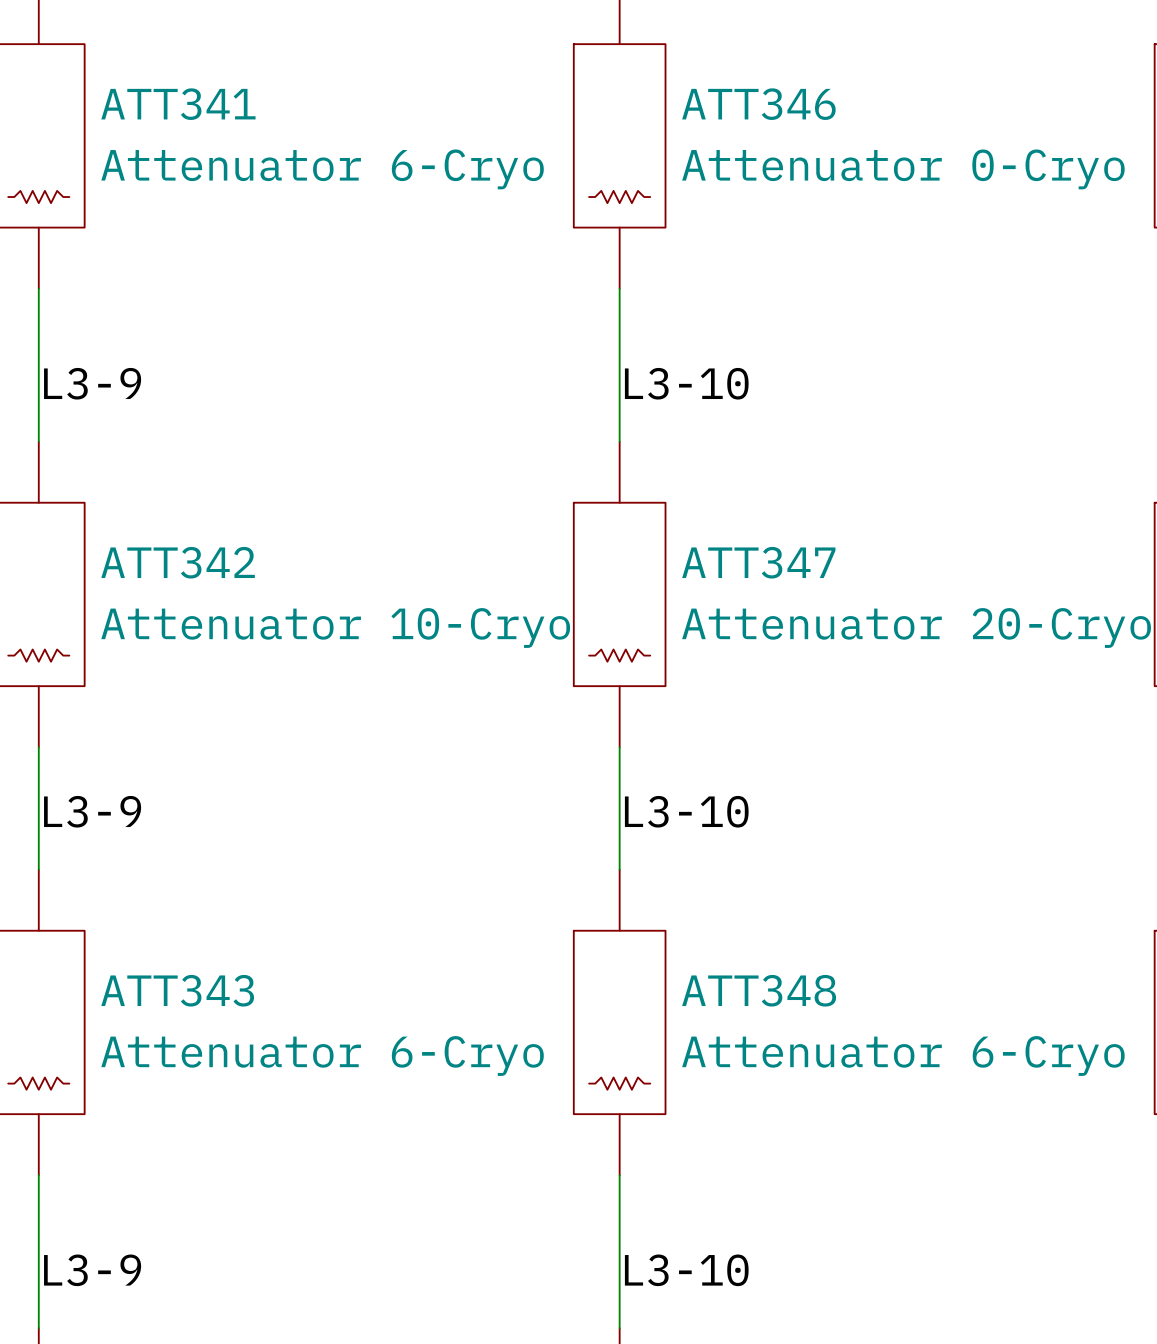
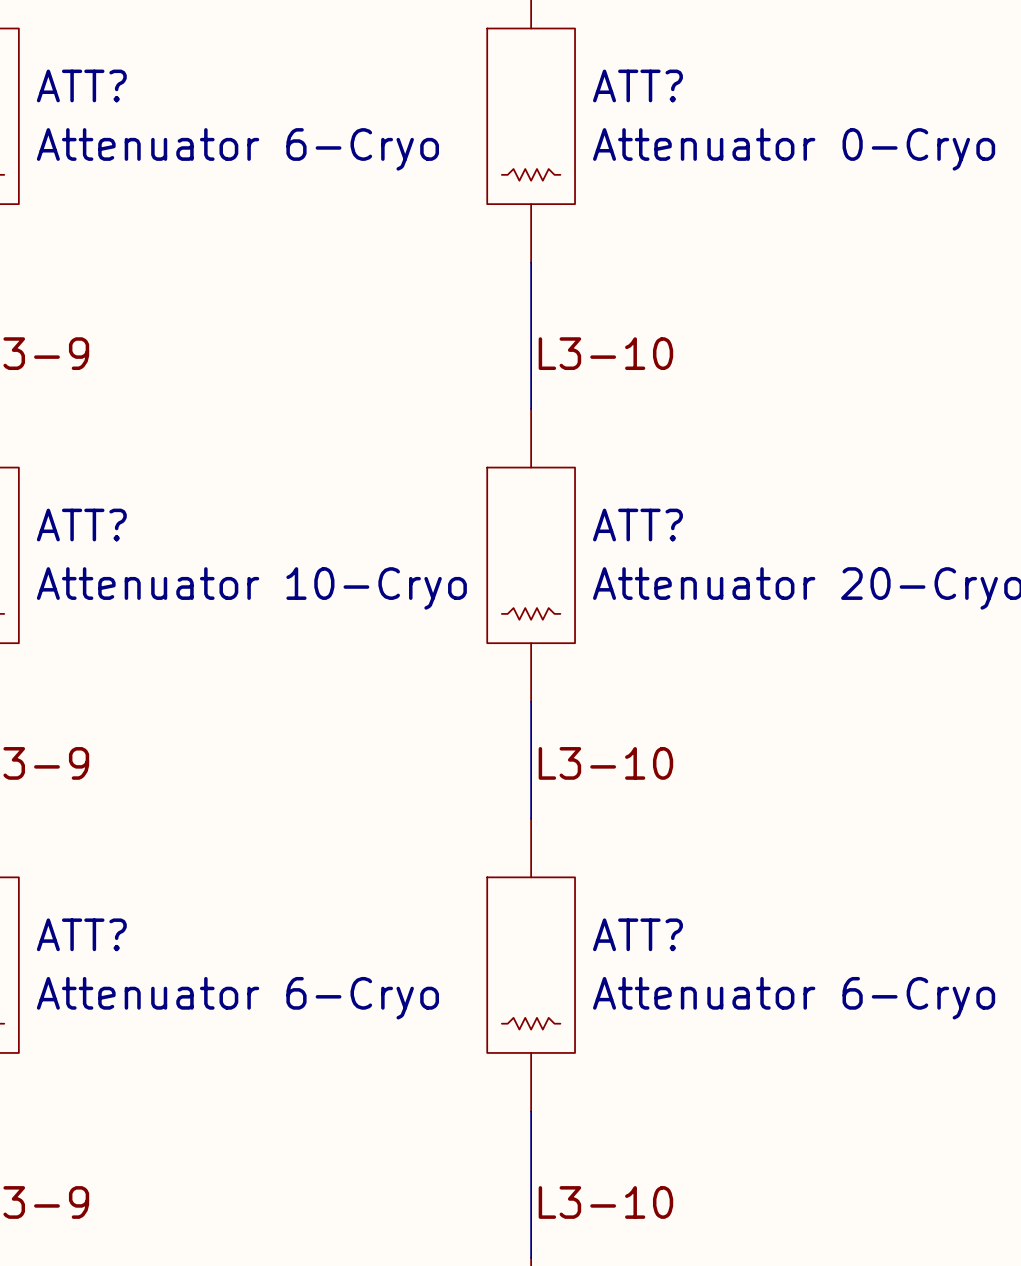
ATT341 name: ATT341 (178, 104) -> ATT? (81, 85)
ATT346 name: ATT346 (758, 104) -> ATT? (637, 85)
ATT342 name: ATT342 (178, 562) -> ATT? (81, 525)
ATT347 name: ATT347 (758, 562) -> ATT? (637, 525)
ATT343 name: ATT343 (177, 990) -> ATT? (81, 934)
ATT348 name: ATT348 (759, 990) -> ATT? (637, 934)

